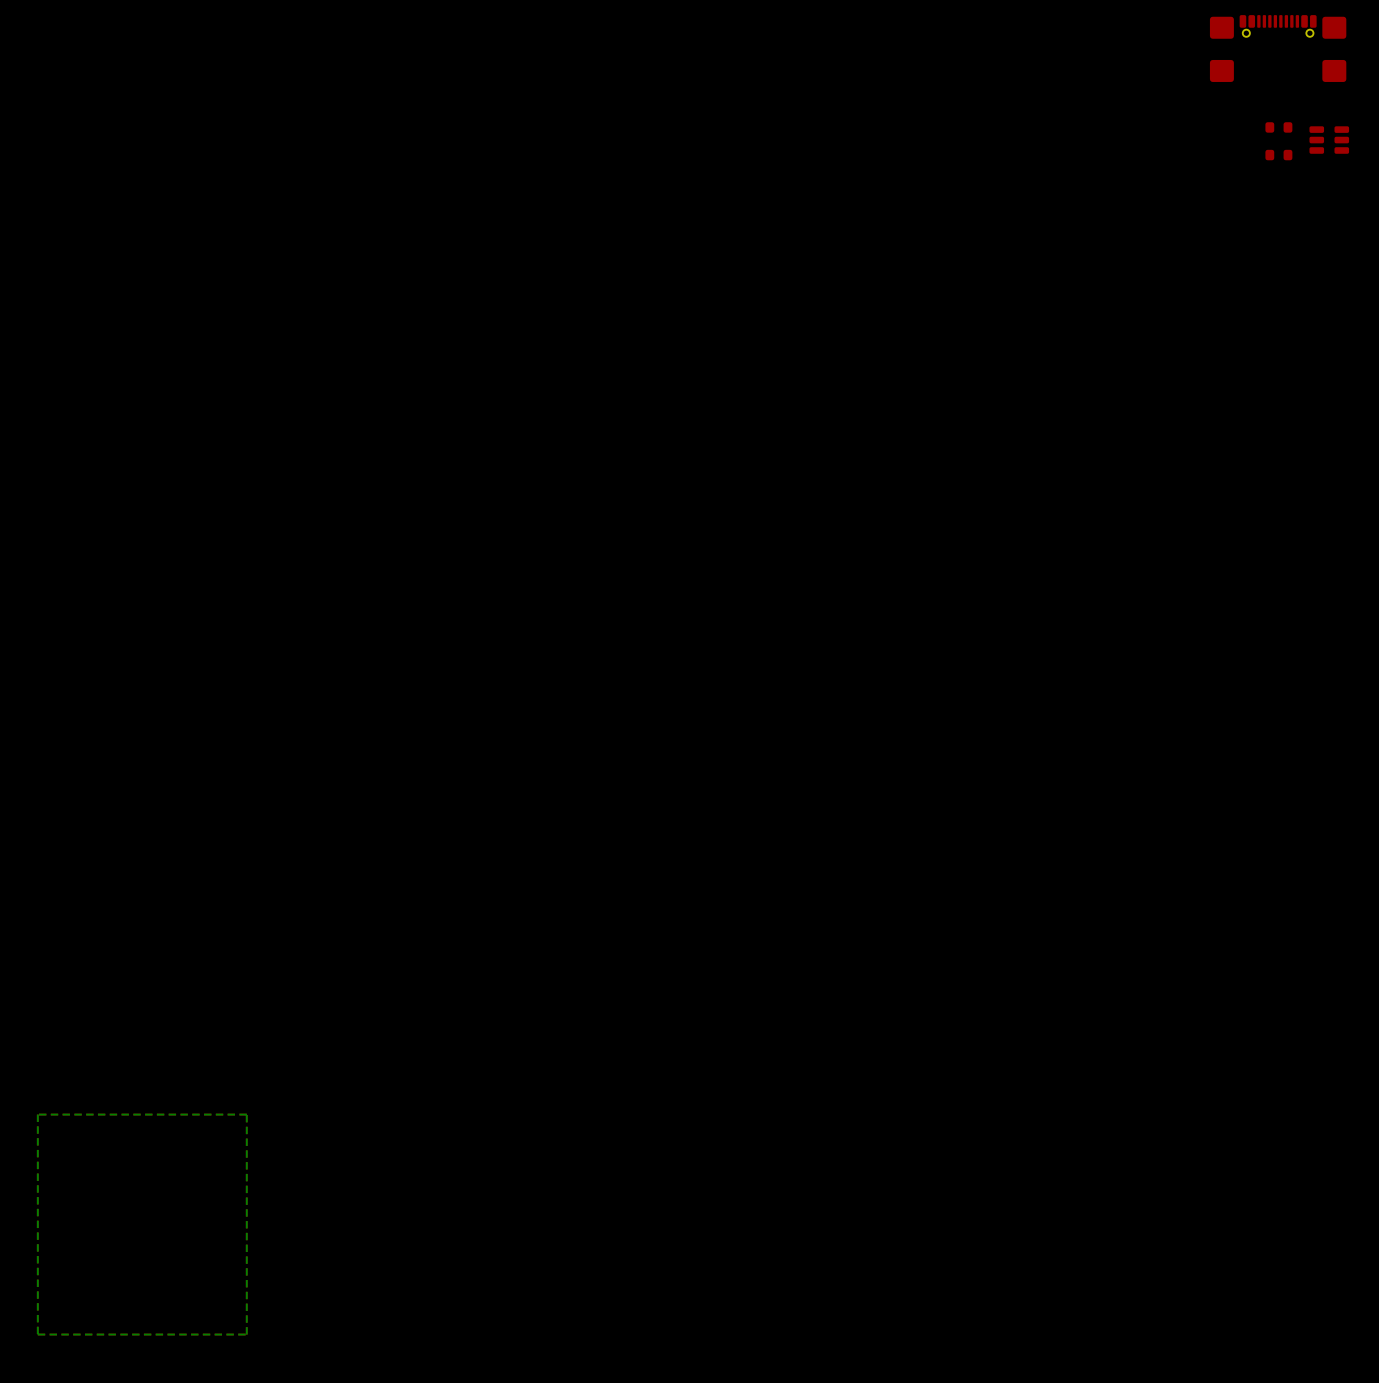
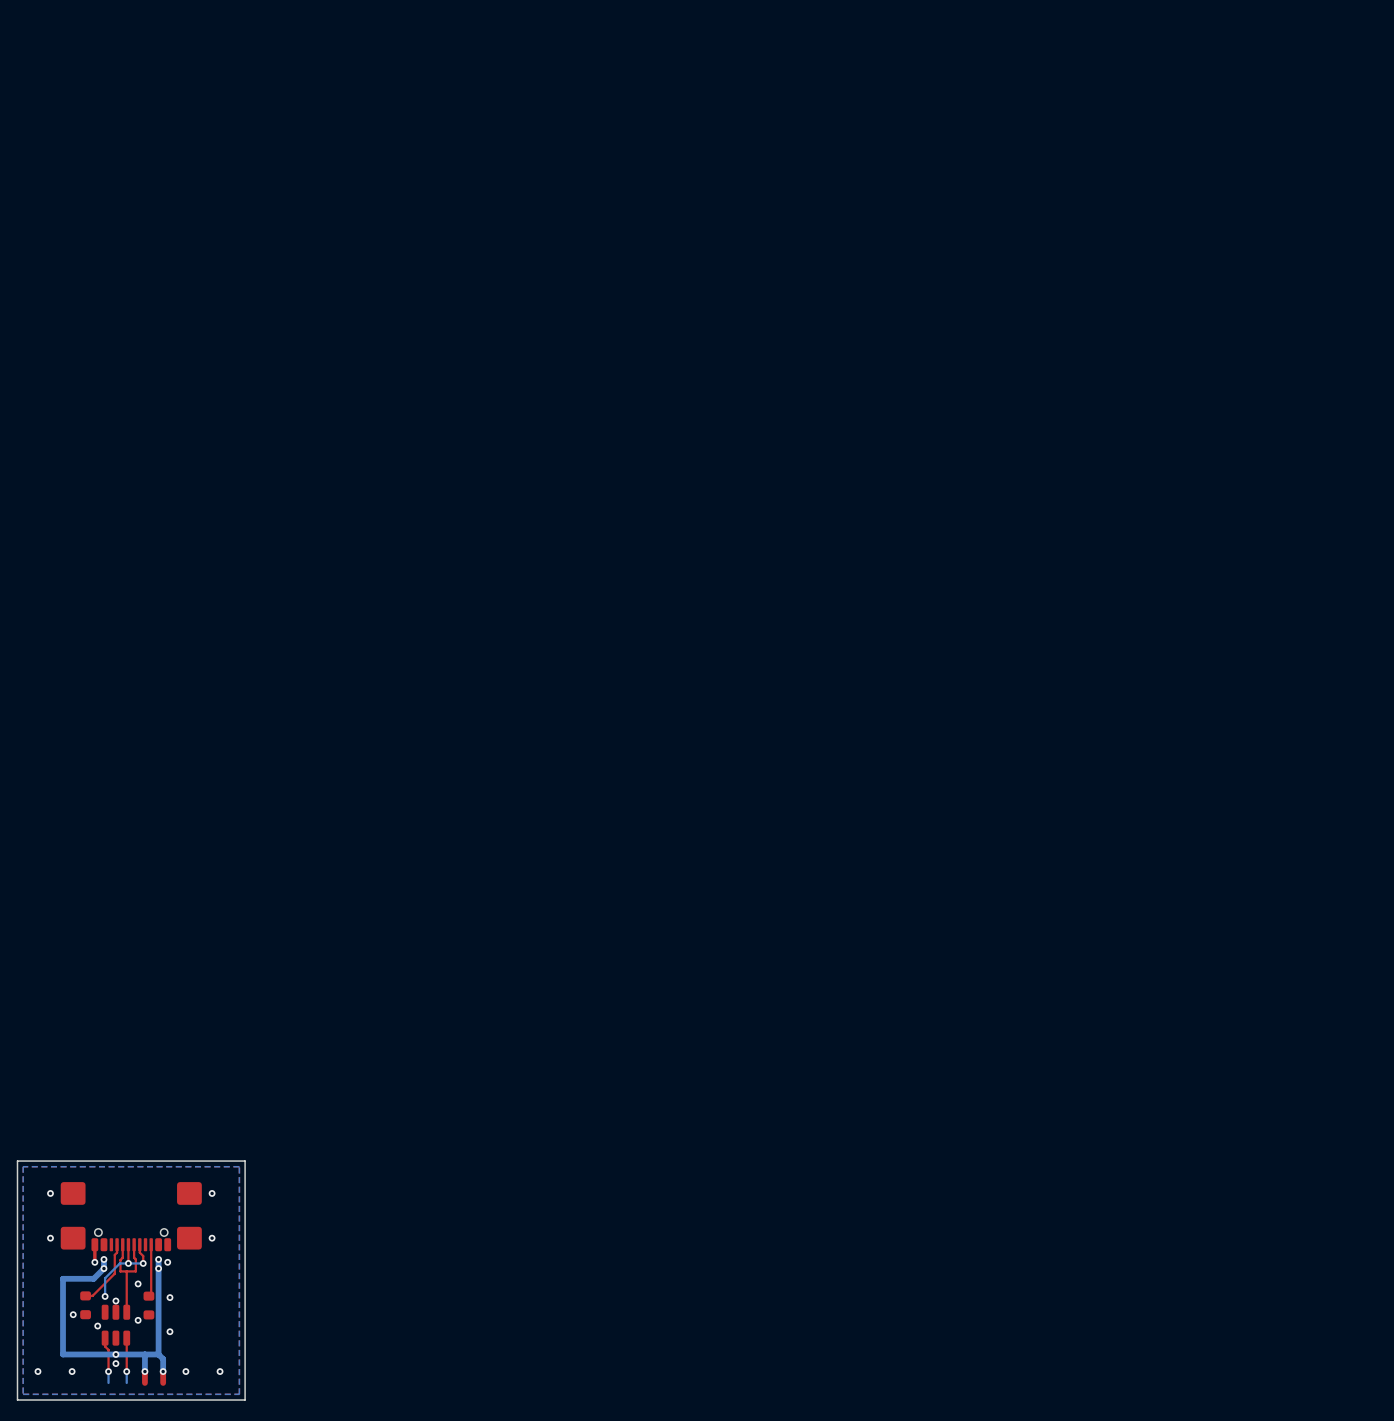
part: (1278, 48) -> none
part: (1278, 127) -> none
part: (1329, 140) -> none
part: (1278, 155) -> none
board edge: none -> (245, 1161) (17, 1161) (17, 1400) (245, 1400) (245, 1161)
via: none -> (50, 1193)
via: none -> (212, 1193)
part: none -> (131, 1216)
via: none -> (50, 1238)
via: none -> (212, 1238)
top track: none -> (94, 1244) (94, 1262)
top track: none -> (117, 1244) (114, 1273) (92, 1295) (85, 1295)
top track: none -> (128, 1244) (128, 1263)
top track: none -> (134, 1244) (135, 1271) (120, 1271) (122, 1244)
top track: none -> (139, 1244) (143, 1263)
top track: none -> (151, 1244) (151, 1293) (148, 1296)
bottom track: none -> (103, 1259) (103, 1268) (93, 1278) (63, 1278) (63, 1354) (158, 1354)
via: none -> (103, 1259)
bottom track: none -> (158, 1259) (158, 1354)
via: none -> (158, 1259)
via: none -> (94, 1262)
via: none -> (167, 1262)
via: none -> (128, 1263)
bottom track: none -> (143, 1263) (119, 1263) (105, 1278) (105, 1296)
via: none -> (143, 1263)
via: none -> (103, 1268)
via: none -> (158, 1268)
top track: none -> (126, 1271) (126, 1312)
via: none -> (138, 1283)
via: none -> (105, 1296)
via: none -> (169, 1297)
via: none -> (115, 1301)
part: none -> (85, 1305)
part: none -> (148, 1305)
via: none -> (73, 1314)
via: none -> (138, 1320)
part: none -> (115, 1325)
via: none -> (97, 1326)
via: none -> (169, 1331)
top track: none -> (105, 1338) (105, 1346) (108, 1349) (108, 1371)
top track: none -> (126, 1338) (126, 1371)
via: none -> (115, 1354)
bottom track: none -> (144, 1354) (144, 1371)
bottom track: none -> (158, 1354) (163, 1359) (163, 1371)
via: none -> (115, 1363)
via: none -> (37, 1371)
via: none -> (72, 1371)
bottom track: none -> (108, 1371) (108, 1382)
via: none -> (108, 1371)
bottom track: none -> (126, 1371) (126, 1382)
via: none -> (126, 1371)
top track: none -> (144, 1371) (144, 1382)
via: none -> (144, 1371)
top track: none -> (163, 1371) (163, 1382)
via: none -> (163, 1371)
via: none -> (185, 1371)
via: none -> (220, 1371)

